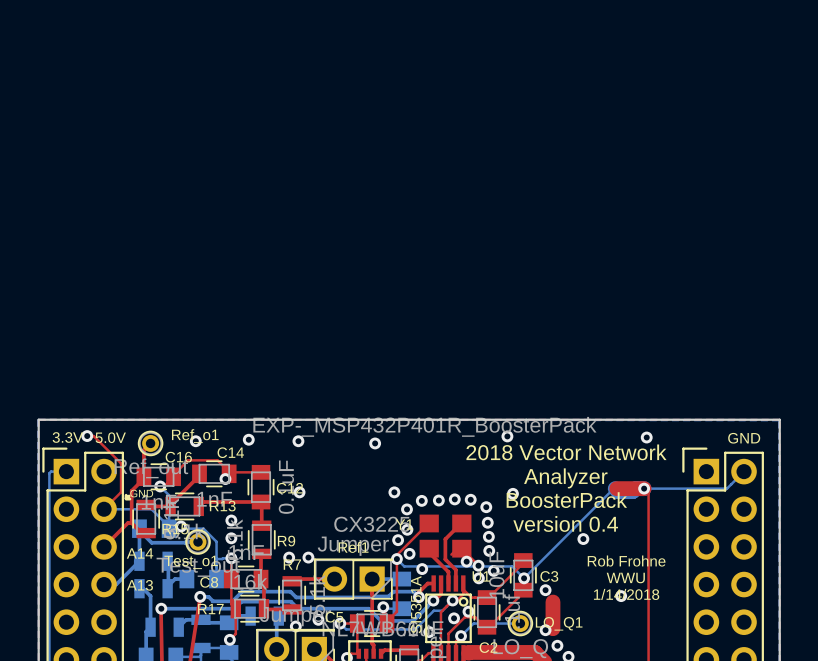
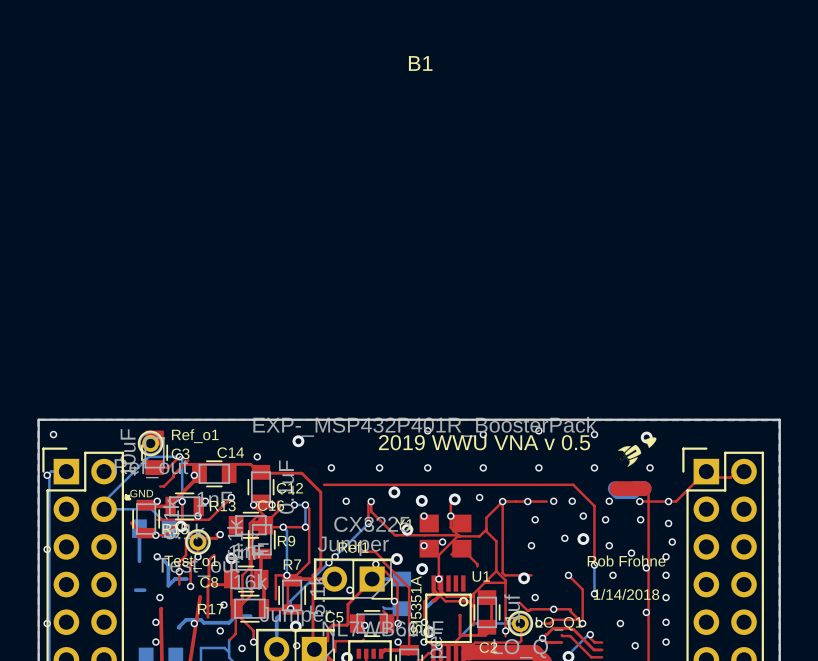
B1 name: none -> B1 (420, 63)
via: none -> (427, 430)
via: none -> (538, 430)
via: none -> (53, 434)
via: none -> (483, 434)
via: none -> (594, 434)
top track: (87, 436) (93, 436) (121, 463) (121, 492) (104, 509) -> none
via: (87, 436) -> none
via: (507, 436) -> none
text: 3.3V (67, 437) -> none
text: 5.0V (110, 437) -> none
drawing: none -> [618, 437, 657, 467]
text: GND (744, 438) -> none
via: (248, 439) -> none
via: (195, 441) -> none
text: none -> 2019 WWU VNA v 0.5 (484, 442)
top track: (150, 443) (143, 450) (143, 478) (131, 490) (131, 523) (127, 523) (104, 546) -> none
via: (375, 443) -> none
text: 2018 Vector Network (566, 452) -> none
top track: none -> (179, 456) (168, 467) (154, 467)
via: none -> (179, 456)
via: none -> (257, 456)
top track: (188, 460) (217, 460) (229, 473) (261, 472) -> none
top track: none -> (747, 460) (730, 477) (700, 477) (675, 501) (639, 501)
top track: none -> (183, 464) (250, 464) (259, 473) (301, 473) (320, 492) (320, 567) (313, 575) (313, 641)
via: none -> (331, 467)
via: none -> (379, 467)
via: none -> (427, 467)
via: none -> (483, 467)
via: none -> (538, 467)
via: none -> (594, 467)
via: none -> (650, 467)
bottom track: (744, 471) (726, 488) (613, 488) (524, 578) (512, 566) (404, 566) (396, 559) -> none
via: none -> (47, 475)
via: none -> (194, 475)
C16 position: (158, 476) -> (250, 525)
text: Analyzer (565, 478) -> none
via: (225, 479) -> none
top track: none -> (323, 484) (573, 484) (594, 506) (594, 565)
bottom track: (160, 486) (169, 495) (169, 528) (203, 528) (216, 541) (216, 579) -> none
via: (160, 486) -> none
via: (644, 488) -> none
via: (299, 492) -> none
via: (512, 493) -> none
top track: none -> (231, 497) (209, 519) (157, 519)
via: none -> (231, 497)
via: none -> (479, 497)
bottom track: none -> (107, 498) (149, 456) (179, 456) (182, 459) (182, 526) (190, 534)
via: (470, 499) -> none
via: (438, 500) -> none
text: BoosterPack (566, 500) -> none
via: none -> (157, 501)
top track: none -> (182, 501) (182, 518) (165, 535) (155, 535)
via: none -> (182, 501)
via: none -> (205, 501)
top track: none -> (278, 501) (278, 510) (251, 541) (251, 594) (241, 605) (241, 618) (253, 630) (253, 642)
via: none -> (346, 501)
via: none -> (371, 501)
top track: none -> (450, 501) (450, 527) (459, 536)
top track: none -> (502, 501) (546, 501)
top track: none -> (502, 501) (502, 572) (505, 575) (531, 575)
top track: none -> (502, 501) (486, 517) (486, 531) (496, 541) (496, 571)
via: none -> (502, 501)
via: none -> (527, 501)
via: none -> (553, 501)
via: none -> (572, 501)
via: none -> (609, 501)
via: none -> (639, 501)
via: none -> (668, 501)
top track: none -> (253, 504) (264, 516) (257, 516) (249, 523) (249, 567)
via: none -> (253, 504)
via: none -> (272, 504)
bottom track: none -> (294, 504) (305, 504) (305, 527)
via: none -> (294, 504)
top track: none -> (305, 504) (309, 508) (309, 562) (296, 575) (275, 575) (275, 599)
via: none -> (305, 504)
top track: (198, 506) (203, 501) (261, 501) (261, 525) -> none
via: (486, 507) -> none
via: (406, 509) -> none
via: none -> (198, 516)
via: none -> (424, 516)
via: none -> (450, 516)
via: none -> (583, 516)
via: none -> (535, 519)
via: none -> (605, 519)
via: none -> (640, 519)
via: (231, 520) -> none
via: (487, 522) -> none
top track: none -> (368, 523) (368, 504) (371, 501) (371, 511) (394, 535) (458, 535)
bottom track: none -> (368, 523) (335, 556)
via: none -> (368, 523)
top track: (429, 523) (396, 555) (396, 611) (386, 623) (383, 619) (383, 607) -> none
top track: (461, 523) (445, 539) (445, 559) (455, 569) (455, 583) -> none
text: version 0.4 (565, 523) -> none
via: none -> (668, 523)
top track: none -> (265, 525) (267, 527) (305, 527)
bottom track: none -> (283, 527) (286, 530) (286, 575)
via: none -> (283, 527)
via: none -> (305, 527)
top track: none -> (486, 529) (479, 536) (457, 536) (438, 555) (438, 588) (446, 596) (472, 596)
bottom track: (139, 530) (151, 542) (198, 542) -> none
top track: none -> (216, 534) (220, 534) (216, 538) (205, 538)
via: none -> (220, 534)
via: none -> (155, 535)
via: (488, 536) -> none
via: (231, 538) -> none
via: none -> (564, 538)
via: (398, 540) -> none
via: none -> (442, 542)
via: none -> (672, 542)
via: none -> (424, 545)
via: none -> (531, 545)
via: none -> (609, 545)
top track: (429, 548) (429, 552) (448, 571) (448, 583) -> none
via: none -> (47, 549)
via: (489, 550) -> none
top track: none -> (361, 551) (375, 551) (409, 587) (408, 654)
text: A14 (140, 553) -> none
via: (409, 553) -> none
via: none -> (631, 553)
top track: none -> (214, 555) (208, 560) (208, 584)
via: none -> (157, 556)
via: none -> (198, 556)
via: none -> (335, 556)
via: none -> (666, 556)
via: (289, 557) -> none
via: (308, 557) -> none
bottom track: (231, 558) (216, 559) -> none
bottom track: (135, 560) (135, 564) (116, 584) (104, 584) -> none
top track: (523, 560) (523, 563) (488, 597) (471, 597) (463, 589) -> none
part: (153, 561) -> none
via: (466, 561) -> none
bottom track: none -> (328, 562) (290, 600) (290, 608)
via: none -> (328, 562)
top track: none -> (375, 564) (375, 567) (381, 568) (397, 583) (397, 622)
via: none -> (375, 564)
via: (478, 565) -> none
bottom track: none -> (594, 565) (594, 593)
via: none -> (594, 565)
top track: none -> (249, 567) (242, 575) (242, 604)
via: none -> (646, 567)
via: (493, 570) -> none
via: none -> (179, 571)
top track: none -> (496, 571) (505, 580) (505, 636)
top track: none -> (496, 571) (473, 595)
top track: none -> (286, 575) (287, 605) (290, 608)
via: none -> (286, 575)
C3 position: (523, 575) -> (154, 452)
top track: none -> (568, 575) (582, 589) (582, 623)
via: none -> (568, 575)
via: none -> (613, 575)
via: none -> (666, 575)
via: (478, 578) -> none
top track: (524, 578) (523, 592) (488, 627) (485, 627) (475, 617) (464, 617) (448, 633) (448, 653) -> none
text: WWU (625, 578) -> none
part: (201, 579) -> none
top track: (372, 579) (373, 653) -> none
via: none -> (438, 579)
top track: none -> (484, 582) (505, 582)
top track: none -> (232, 583) (208, 584)
top track: (433, 583) (427, 583) (418, 592) (418, 597) -> none
top track: (463, 583) (463, 594) (456, 600) (452, 600) (440, 612) (440, 653) -> none
top track: none -> (179, 584) (179, 561) (186, 555) (186, 539) (190, 534) (198, 542) (198, 556) (190, 564) (190, 586)
top track: none -> (208, 584) (207, 617)
text: A13 (139, 585) -> none
via: none -> (190, 586)
top track: none -> (366, 586) (348, 604) (348, 624) (332, 625) (327, 630) (327, 641)
bottom track: (139, 588) (143, 588) (150, 596) (150, 627) (146, 631) (146, 656) -> none
part: (153, 588) -> none
via: none -> (349, 590)
via: (545, 590) -> none
top track: none -> (473, 593) (473, 625)
via: none -> (594, 593)
bottom track: (200, 596) (208, 596) (212, 601) -> none
via: (200, 596) -> none
via: (621, 596) -> none
via: none -> (159, 597)
bottom track: (418, 597) (413, 591) (393, 591) (388, 596) (374, 597) (296, 597) (290, 591) (242, 591) (232, 601) (212, 601) -> none
via: (418, 597) -> none
via: none -> (535, 597)
via: none -> (666, 597)
top track: none -> (491, 598) (491, 629) (485, 635) (460, 635) (460, 615)
via: (433, 600) -> none
bottom track: (452, 600) (442, 610) (433, 610) (415, 629) (346, 629) (340, 623) -> none
via: (452, 600) -> none
via: none -> (394, 601)
top track: none -> (519, 602) (527, 610) (570, 609) (583, 624)
top track: (552, 602) (552, 628) -> none
via: none -> (223, 605)
bottom track: (427, 606) (413, 620) (381, 620) (368, 608) (298, 608) (291, 601) (241, 601) (234, 608) (161, 608) -> none
top track: none -> (473, 606) (468, 601) (445, 601) (434, 591) (424, 601) (424, 622)
via: (383, 607) -> none
via: (161, 608) -> none
via: none -> (290, 608)
via: none -> (553, 609)
via: (468, 611) -> none
via: none -> (646, 612)
part: (264, 616) -> none
via: (454, 618) -> none
via: (318, 619) -> none
top track: none -> (578, 619) (553, 619) (549, 623) (538, 623)
via: none -> (155, 622)
via: none -> (424, 622)
via: none -> (666, 622)
via: none -> (47, 623)
via: none -> (194, 623)
top track: (340, 623) (357, 623) (358, 653) (351, 653) (346, 657) -> none
via: (340, 623) -> none
via: none -> (398, 623)
via: none -> (538, 623)
via: none -> (582, 623)
via: none -> (620, 623)
via: none -> (364, 625)
part: (164, 627) -> none
top track: none -> (521, 629) (519, 642) (432, 644) (429, 642) (424, 642)
via: none -> (505, 630)
via: (545, 630) -> none
part: (200, 633) -> none
top track: none -> (590, 634) (590, 638) (594, 642) (602, 642)
bottom track: none -> (590, 634) (572, 650)
via: none -> (590, 634)
top track: none -> (561, 635) (570, 636) (591, 657) (602, 657)
via: (461, 636) -> none
part: (229, 637) -> none
via: none -> (542, 638)
via position: (229, 639) -> (220, 630)
top track: none -> (363, 639) (362, 641) (335, 641) (335, 651)
via: none -> (155, 642)
via: none -> (253, 642)
via: none -> (398, 642)
via: none -> (424, 642)
top track: none -> (561, 642) (546, 642) (542, 638) (553, 628) (570, 628) (594, 649) (602, 649)
via: none -> (666, 642)
via: none -> (296, 645)
via: none -> (438, 645)
via: (557, 645) -> none
via: none -> (635, 645)
via: none -> (242, 648)
bottom track: (200, 655) (175, 656) -> none

